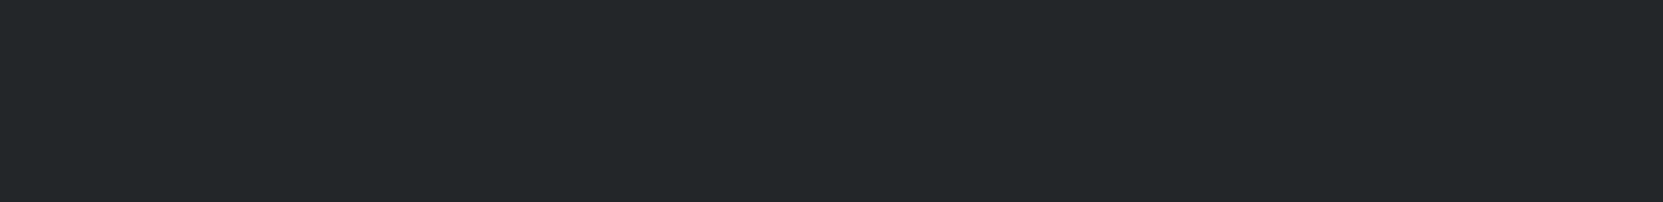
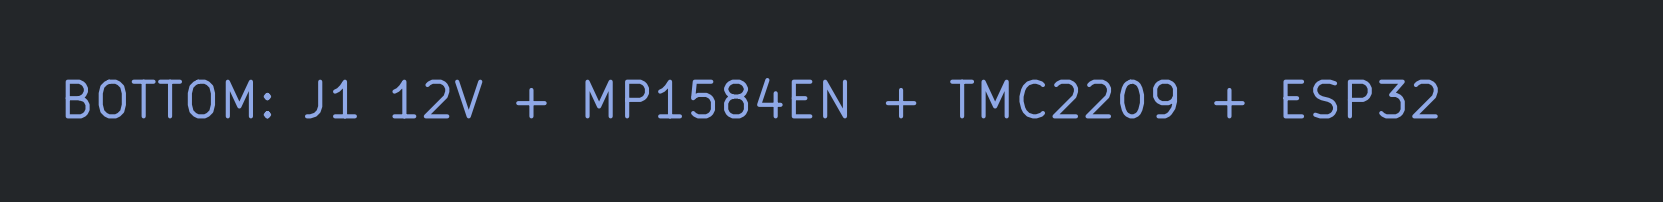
text: none -> BOTTOM: J1 12V + MP1584EN + TMC2209 + ESP32 (751, 98)

